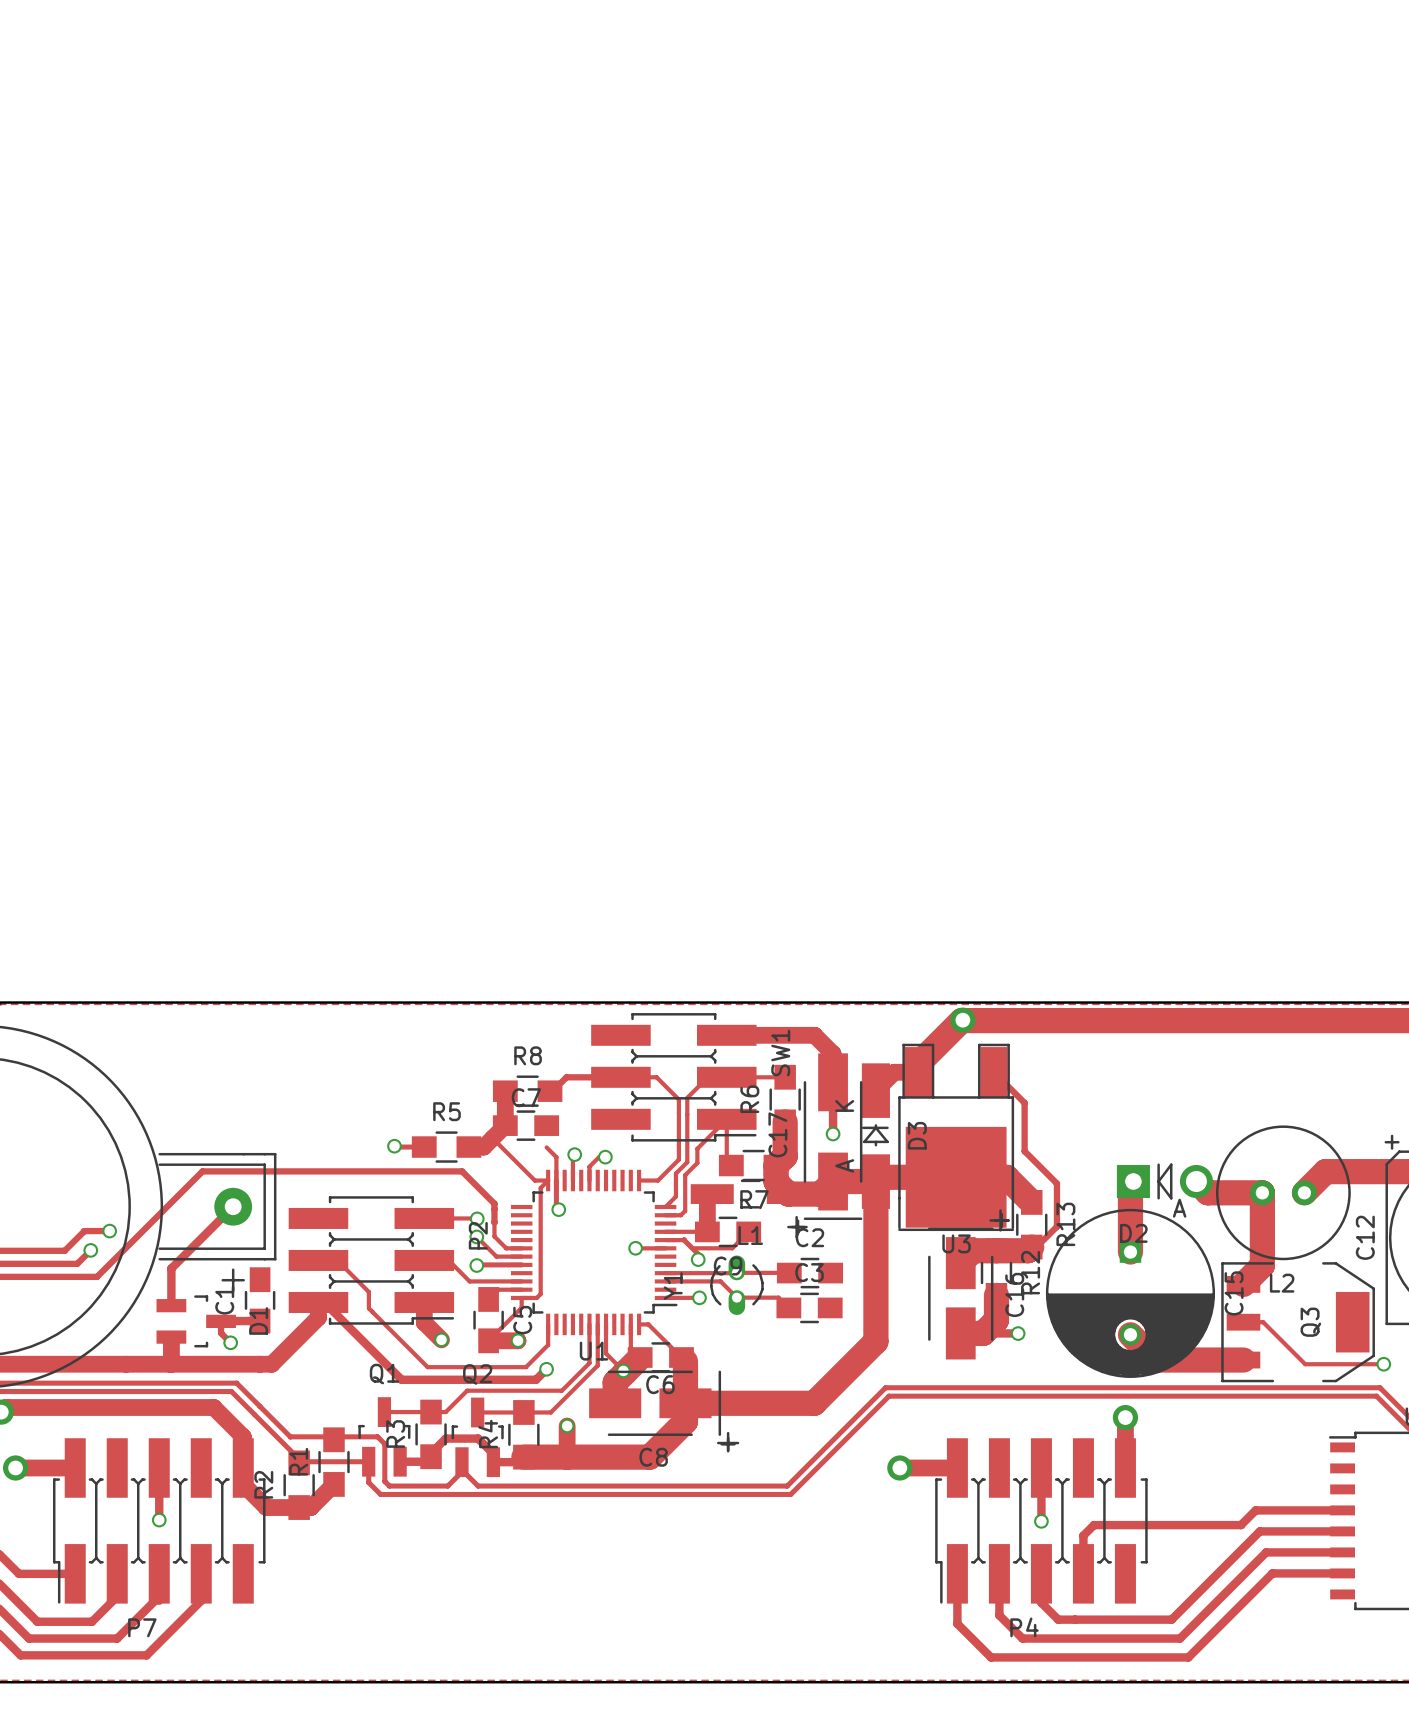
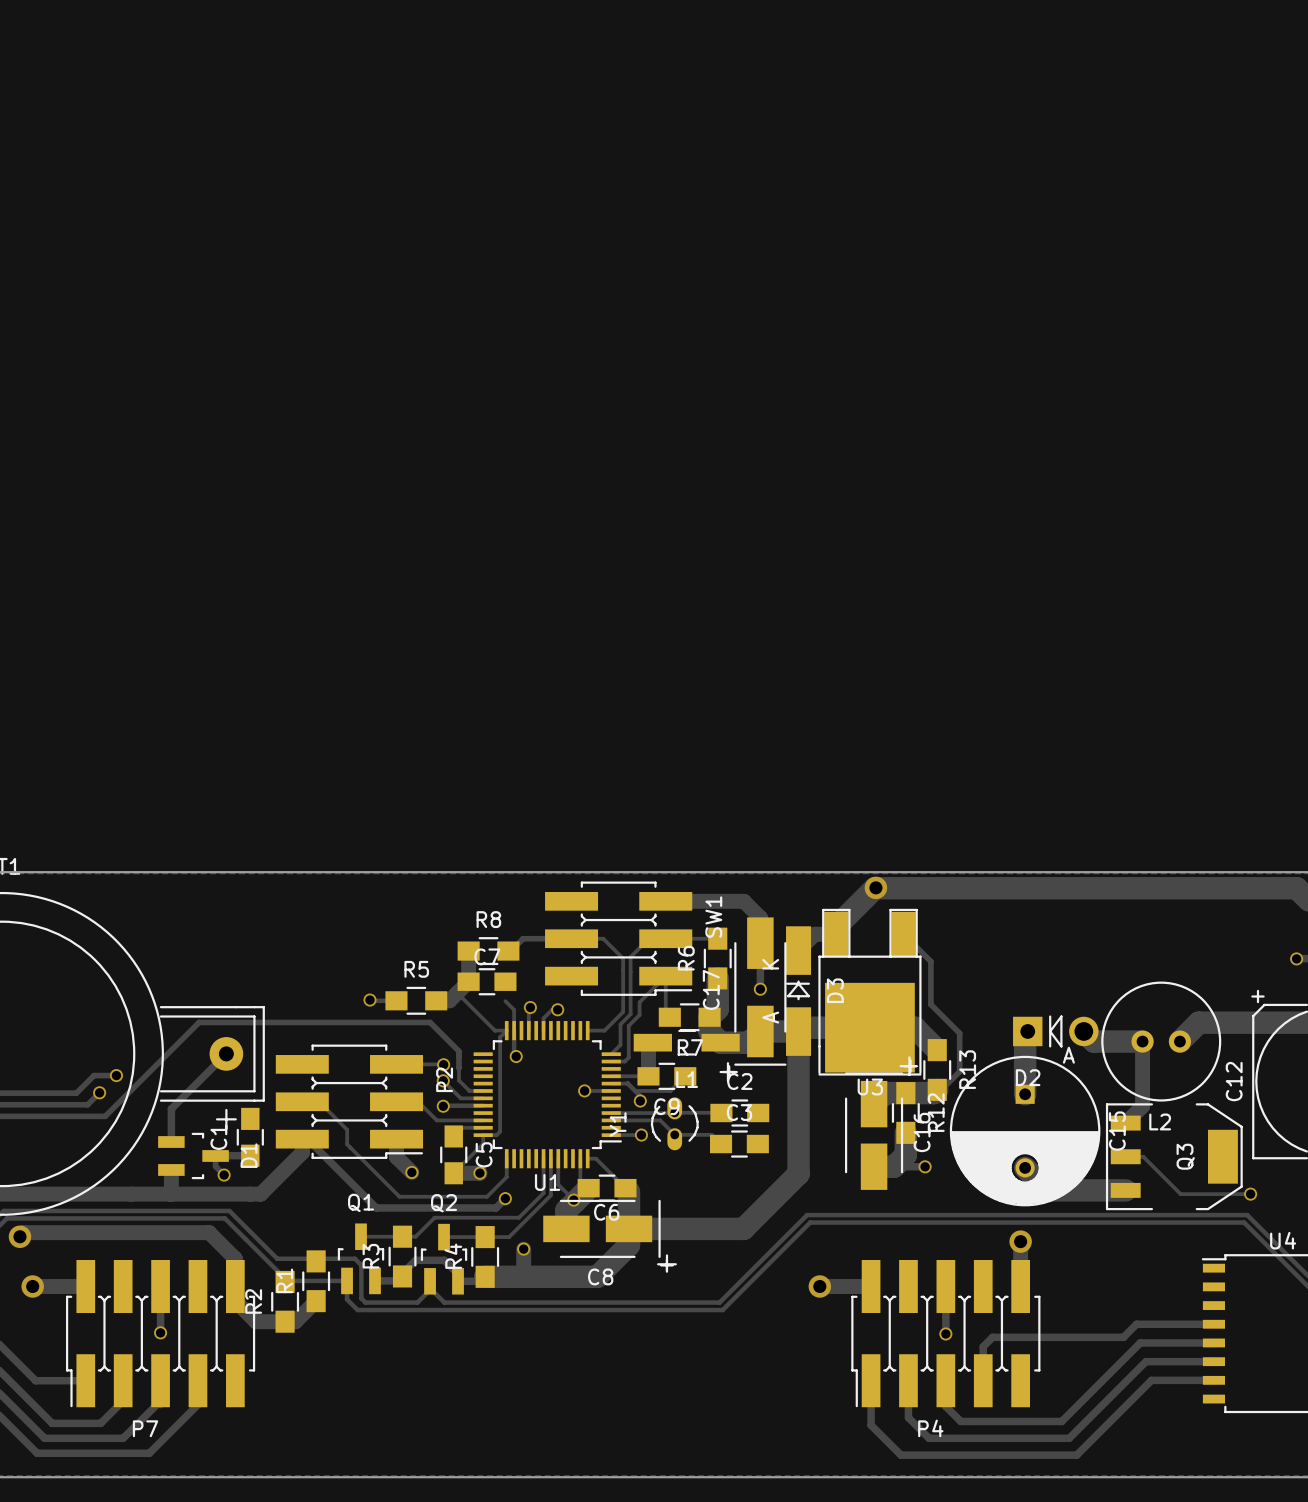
track width: thick (1262, 1192) (1262, 1265) (1243, 1284) -> thin (1142, 1041) (1142, 1106) (1125, 1123)

